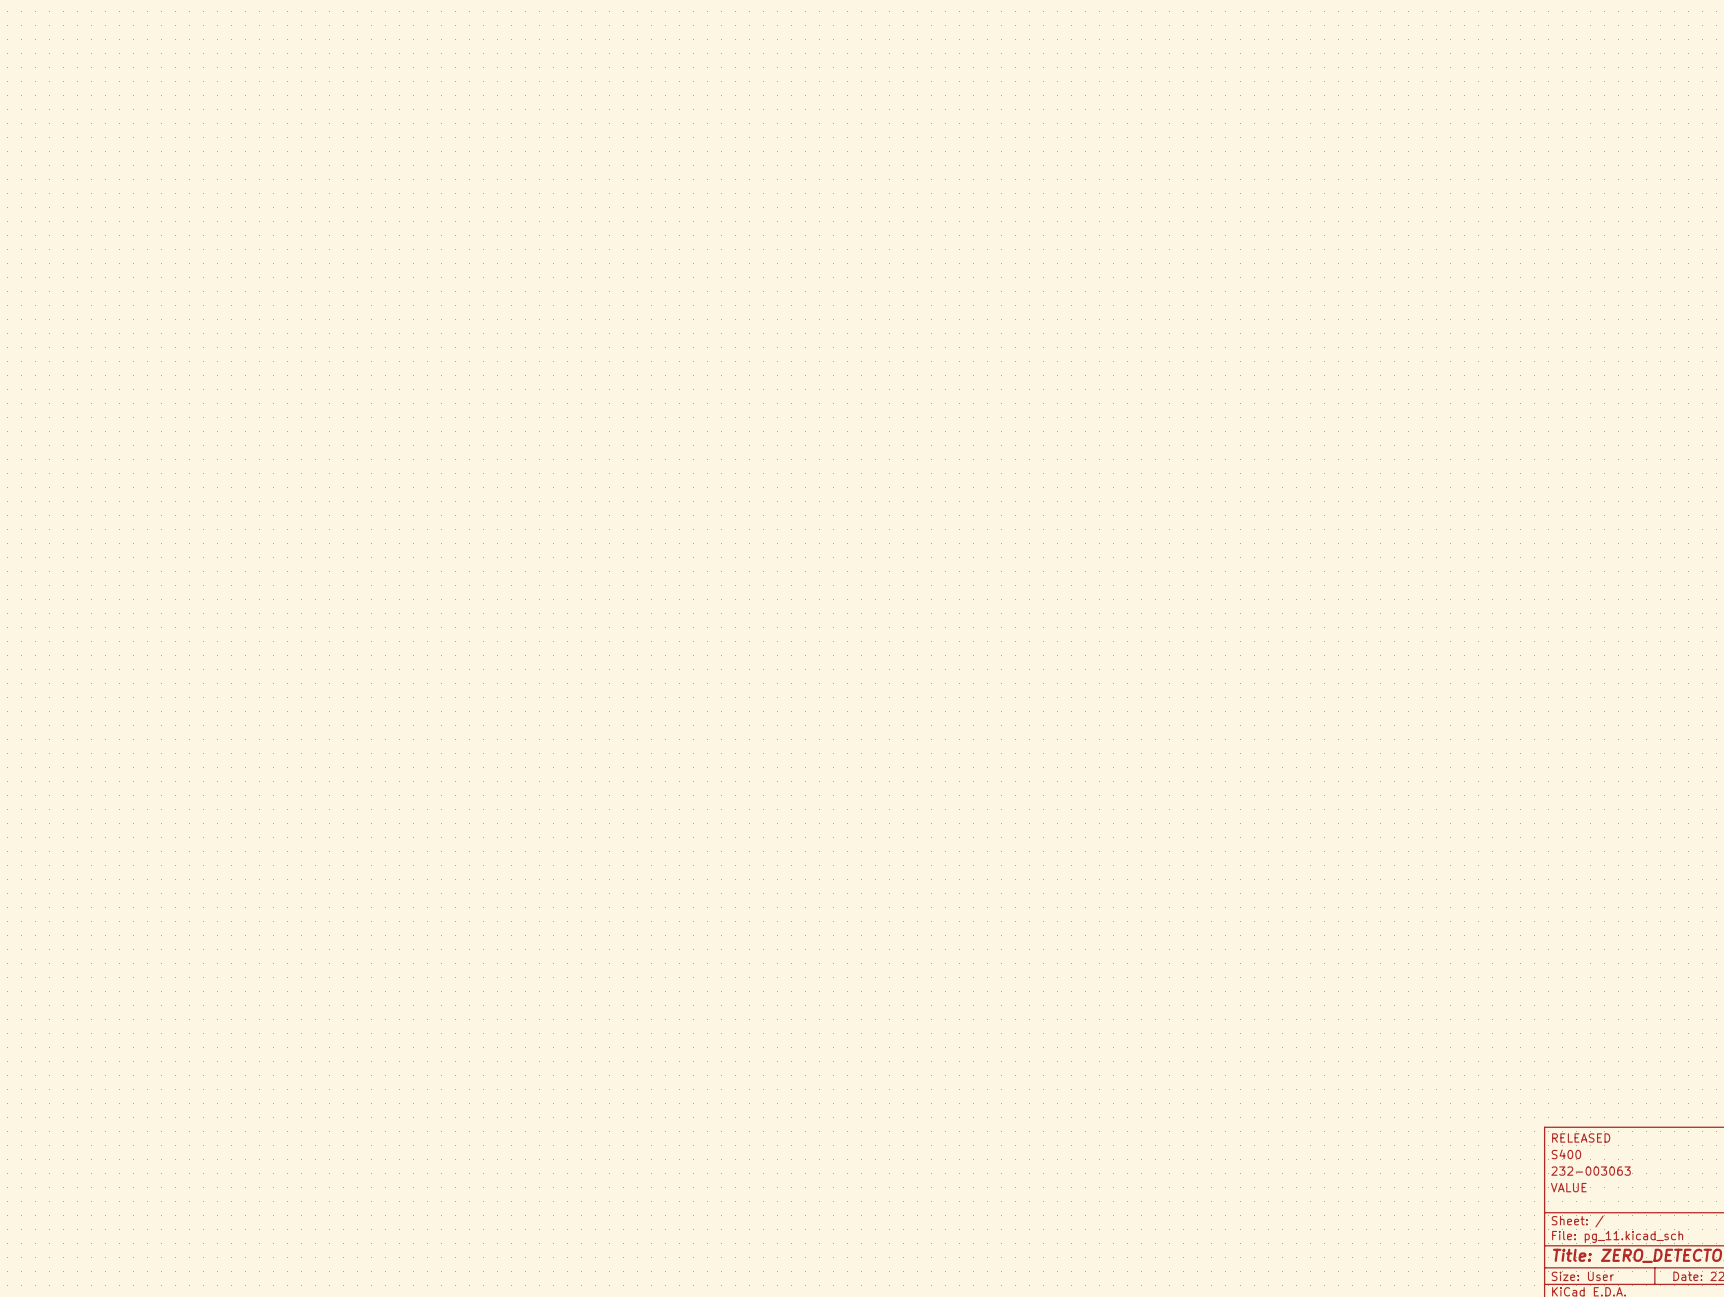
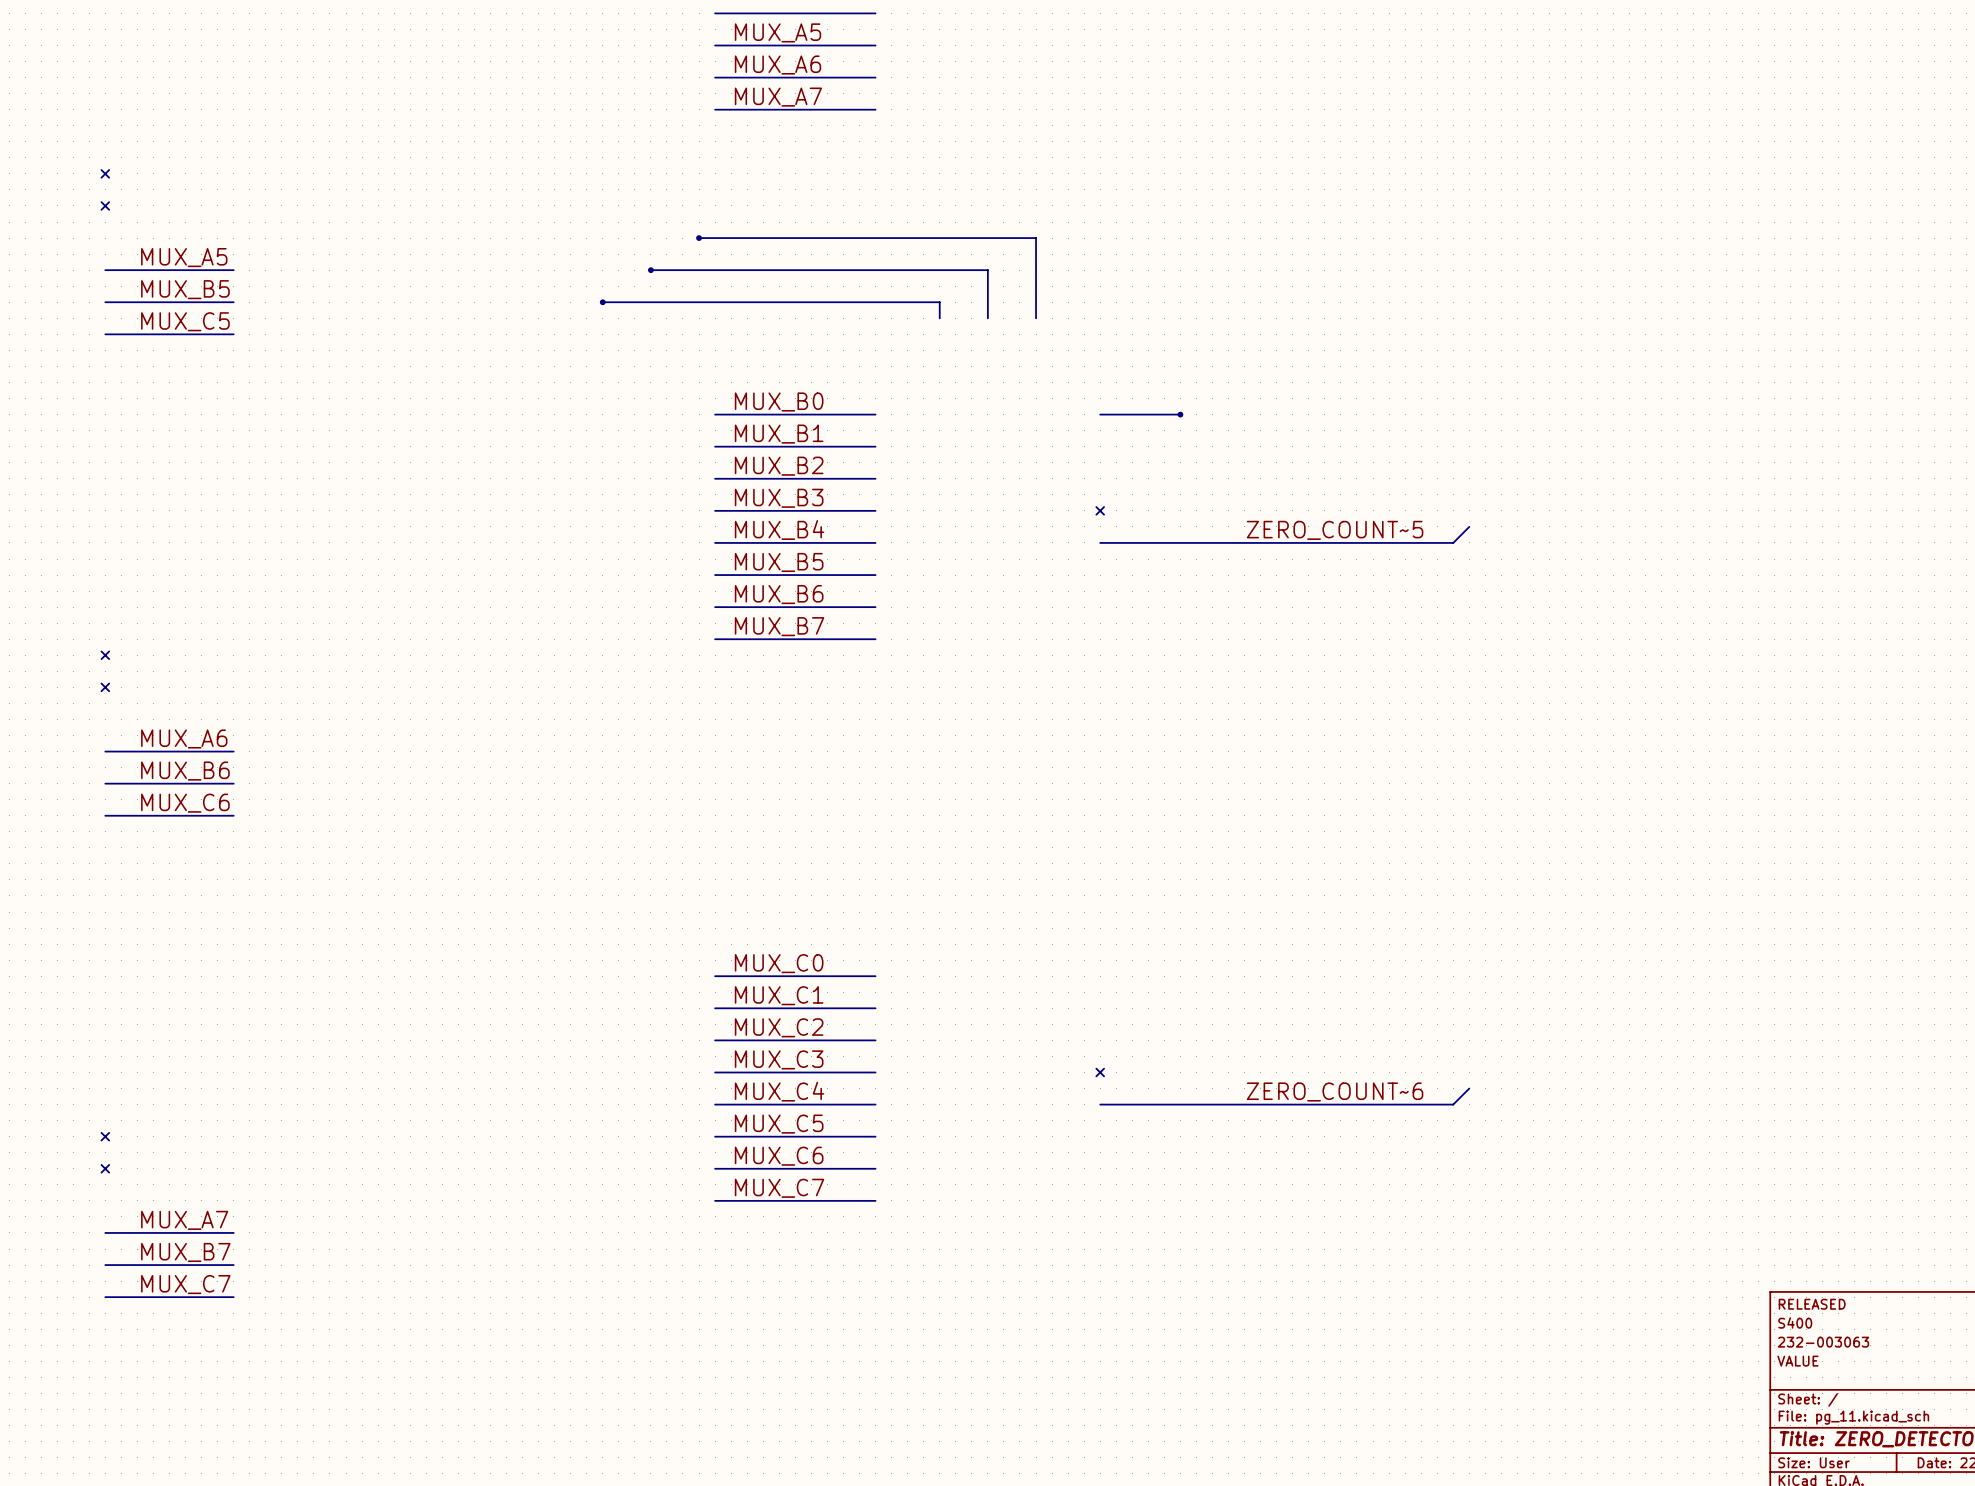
wire: none -> (715, 13) (875, 13)
label: none -> MUX_A5 (778, 32)
wire: none -> (715, 45) (875, 45)
label: none -> MUX_A6 (778, 65)
wire: none -> (715, 77) (875, 77)
label: none -> MUX_A7 (778, 97)
wire: none -> (715, 109) (875, 109)
no-connect mark: none -> (105, 173)
no-connect mark: none -> (105, 205)
wire: none -> (699, 238) (1036, 238) (1036, 318)
junction: none -> (699, 238)
label: none -> MUX_A5 (184, 257)
wire: none -> (105, 270) (233, 270)
wire: none -> (650, 270) (987, 270) (987, 318)
junction: none -> (650, 270)
label: none -> MUX_B5 (185, 289)
wire: none -> (105, 302) (233, 302)
wire: none -> (602, 302) (939, 302) (939, 318)
junction: none -> (602, 302)
label: none -> MUX_C5 (185, 321)
wire: none -> (105, 334) (233, 334)
label: none -> MUX_B0 (779, 401)
wire: none -> (715, 414) (875, 414)
wire: none -> (1100, 414) (1180, 414)
junction: none -> (1180, 414)
label: none -> MUX_B1 (779, 434)
wire: none -> (715, 446) (875, 446)
label: none -> MUX_B2 (779, 466)
wire: none -> (715, 478) (875, 478)
label: none -> MUX_B3 (779, 498)
wire: none -> (715, 510) (875, 510)
no-connect mark: none -> (1100, 510)
wire: none -> (1469, 526) (1453, 542) (1100, 542)
label: none -> MUX_B4 (779, 529)
label: none -> ZERO_COUNT~5 (1335, 530)
wire: none -> (715, 542) (875, 542)
label: none -> MUX_B5 (779, 562)
wire: none -> (715, 575) (875, 575)
label: none -> MUX_B6 (779, 594)
wire: none -> (715, 607) (875, 607)
label: none -> MUX_B7 (779, 626)
wire: none -> (715, 639) (875, 639)
no-connect mark: none -> (105, 655)
no-connect mark: none -> (105, 687)
label: none -> MUX_A6 (184, 738)
wire: none -> (105, 751) (233, 751)
label: none -> MUX_B6 (185, 771)
wire: none -> (105, 783) (233, 783)
label: none -> MUX_C6 (185, 803)
wire: none -> (105, 815) (233, 815)
label: none -> MUX_C0 (779, 963)
wire: none -> (715, 976) (875, 976)
label: none -> MUX_C1 (779, 995)
wire: none -> (715, 1008) (875, 1008)
label: none -> MUX_C2 (779, 1027)
wire: none -> (715, 1040) (875, 1040)
label: none -> MUX_C3 (779, 1059)
wire: none -> (715, 1072) (875, 1072)
no-connect mark: none -> (1100, 1072)
wire: none -> (1469, 1088) (1453, 1104) (1100, 1104)
label: none -> MUX_C4 (779, 1091)
label: none -> ZERO_COUNT~6 (1335, 1091)
wire: none -> (715, 1104) (875, 1104)
label: none -> MUX_C5 (779, 1124)
no-connect mark: none -> (105, 1136)
wire: none -> (715, 1136) (875, 1136)
label: none -> MUX_C6 (779, 1156)
no-connect mark: none -> (105, 1168)
wire: none -> (715, 1168) (875, 1168)
label: none -> MUX_C7 (779, 1188)
wire: none -> (715, 1200) (875, 1200)
label: none -> MUX_A7 (184, 1220)
wire: none -> (105, 1232) (233, 1232)
label: none -> MUX_B7 (185, 1252)
wire: none -> (105, 1265) (233, 1265)
label: none -> MUX_C7 (185, 1284)
wire: none -> (105, 1297) (233, 1297)

